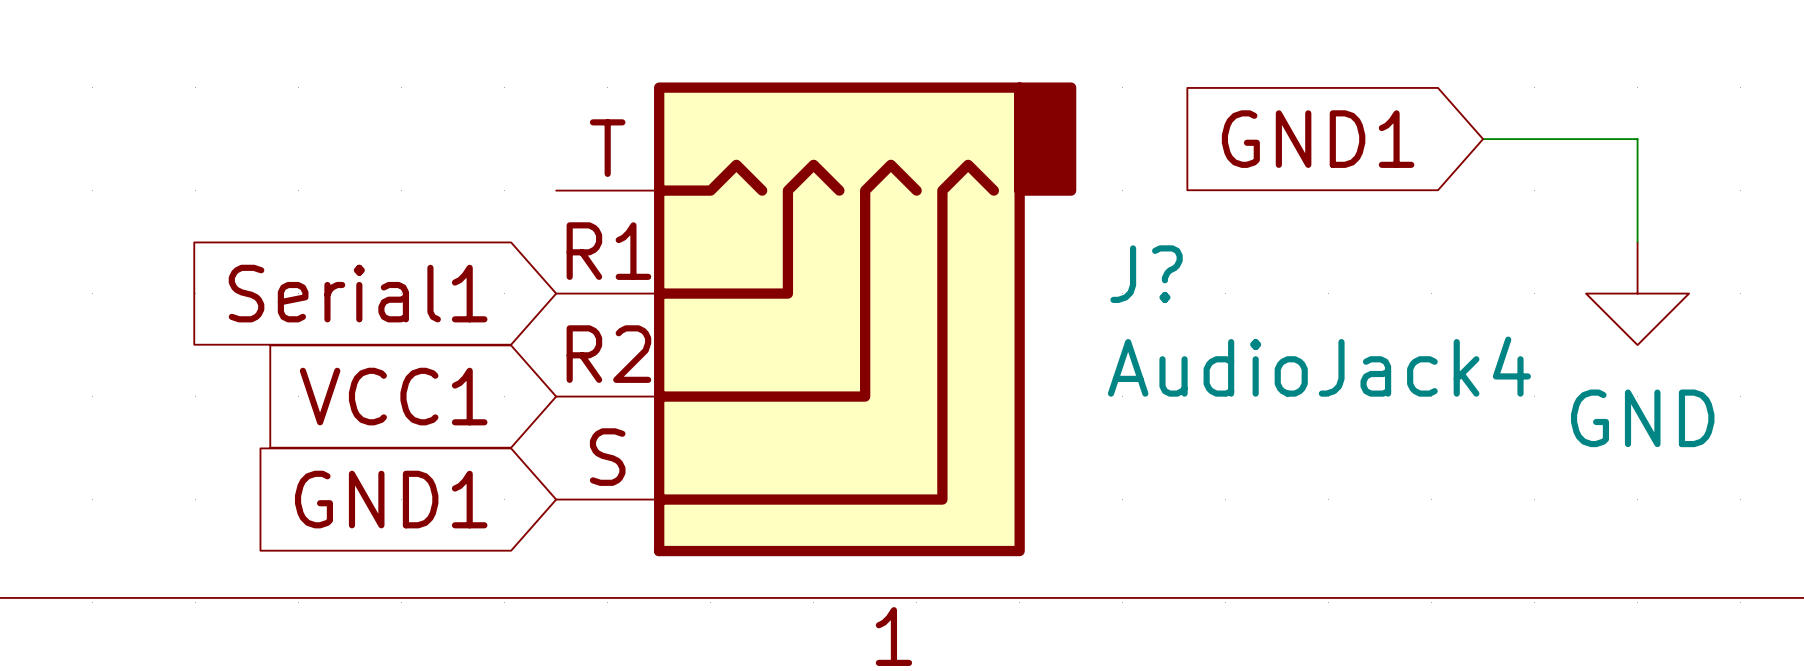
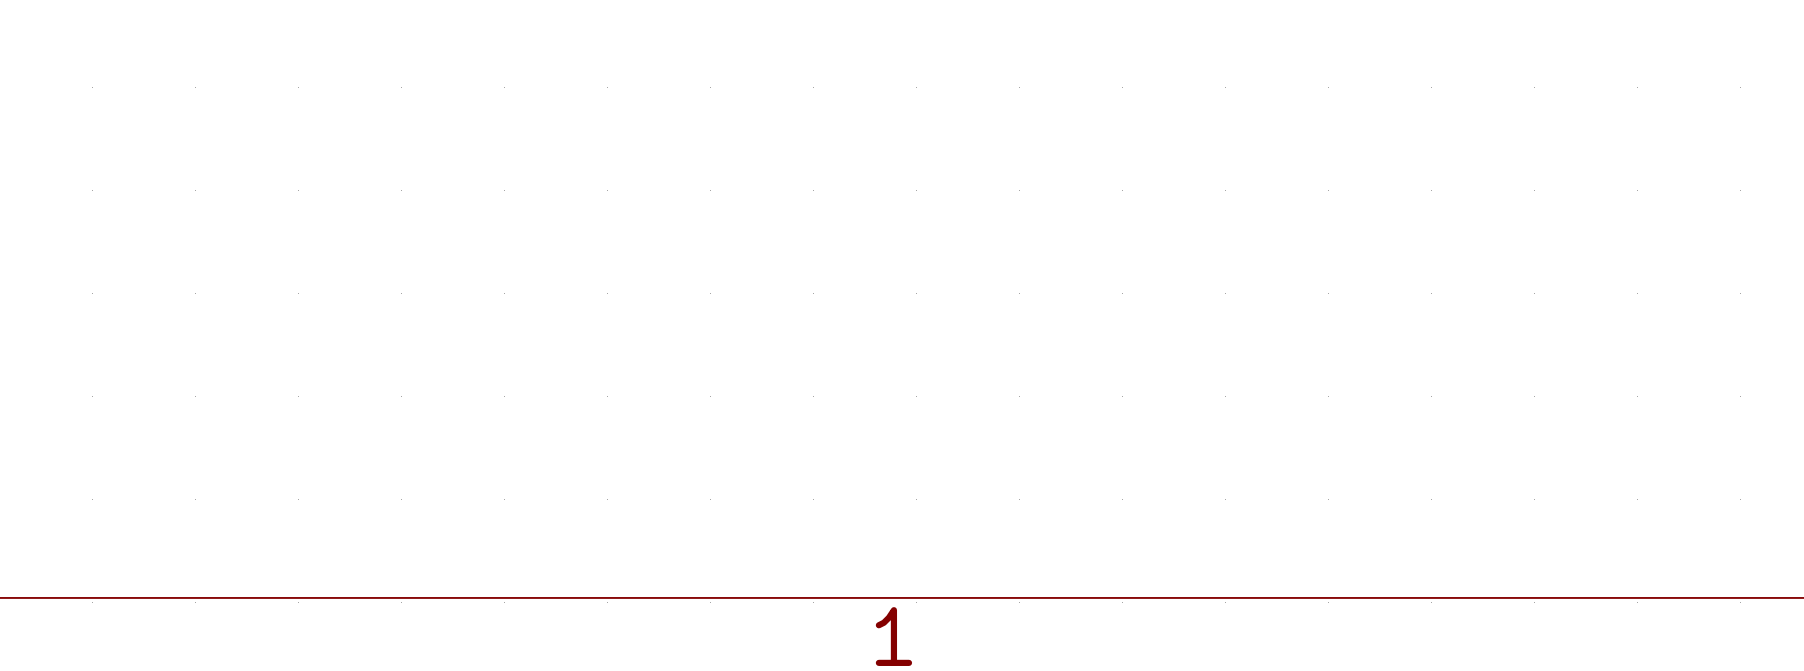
global label: GND1 (1318, 139) -> none
wire: (1483, 139) (1637, 139) (1637, 242) -> none
global label: Serial1 (358, 293) -> none
power symbol: GND (1637, 293) -> none
J?: AudioJack4 (816, 319) -> none
global label: VCC1 (393, 396) -> none
global label: GND1 (391, 499) -> none

